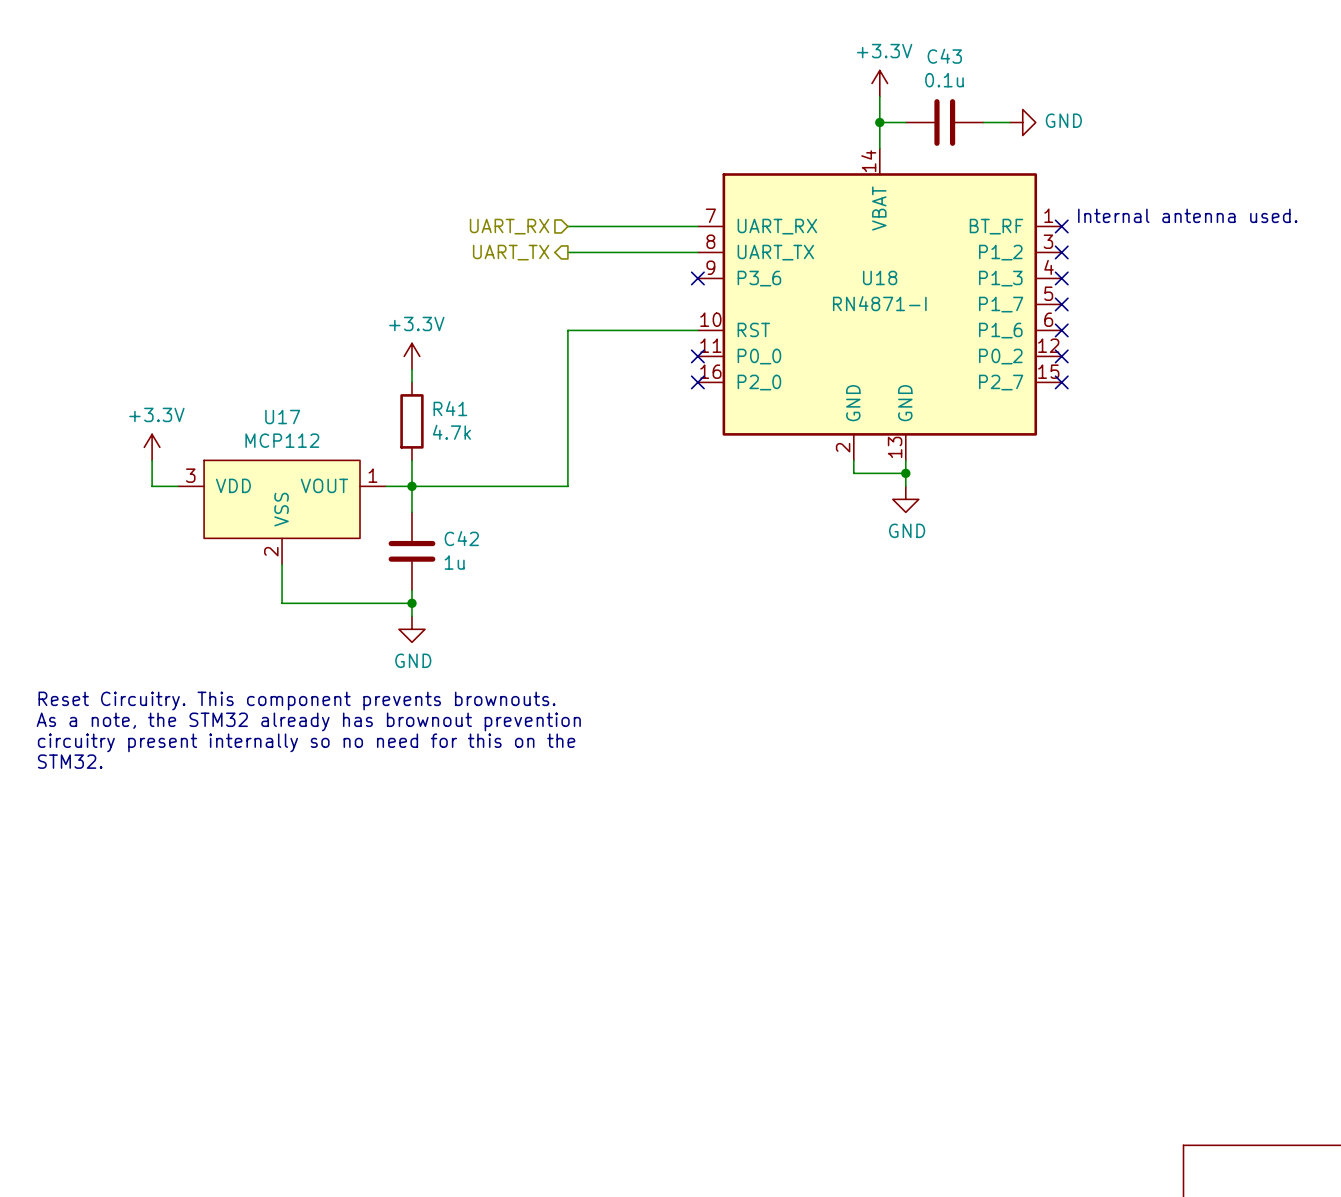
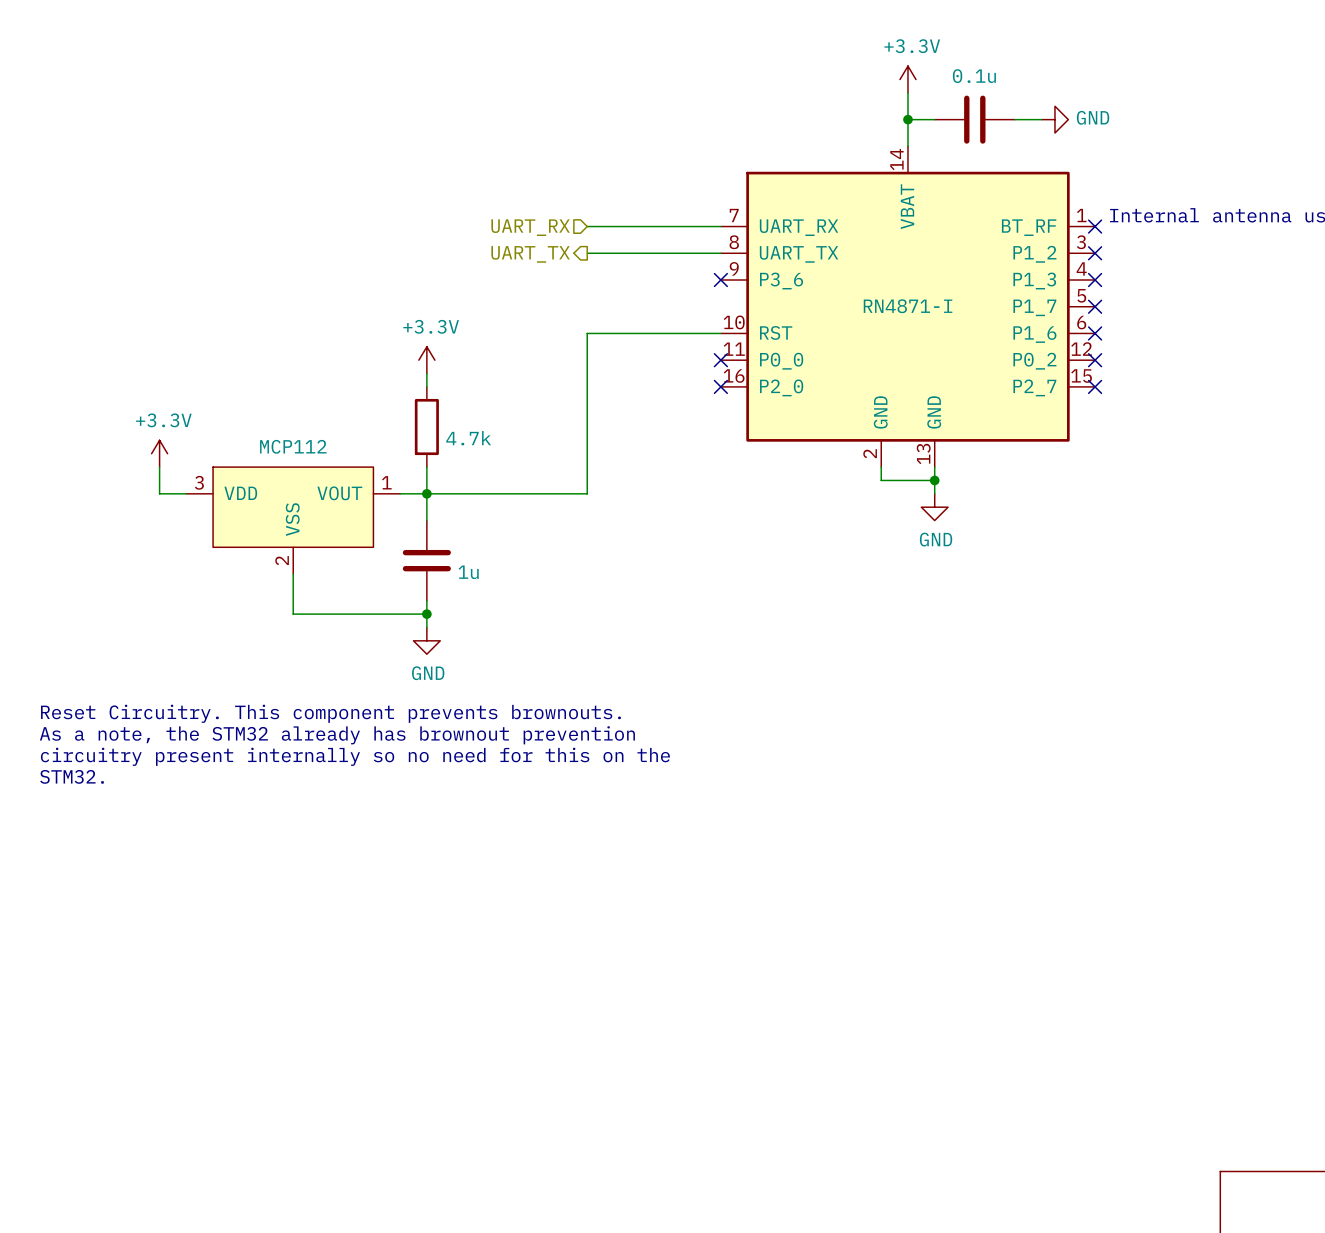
C43 name: C43 (944, 56) -> none
U18 name: U18 (880, 277) -> none
R41 name: R41 (450, 408) -> none
U17 name: U17 (282, 417) -> none
C42 name: C42 (461, 538) -> none

